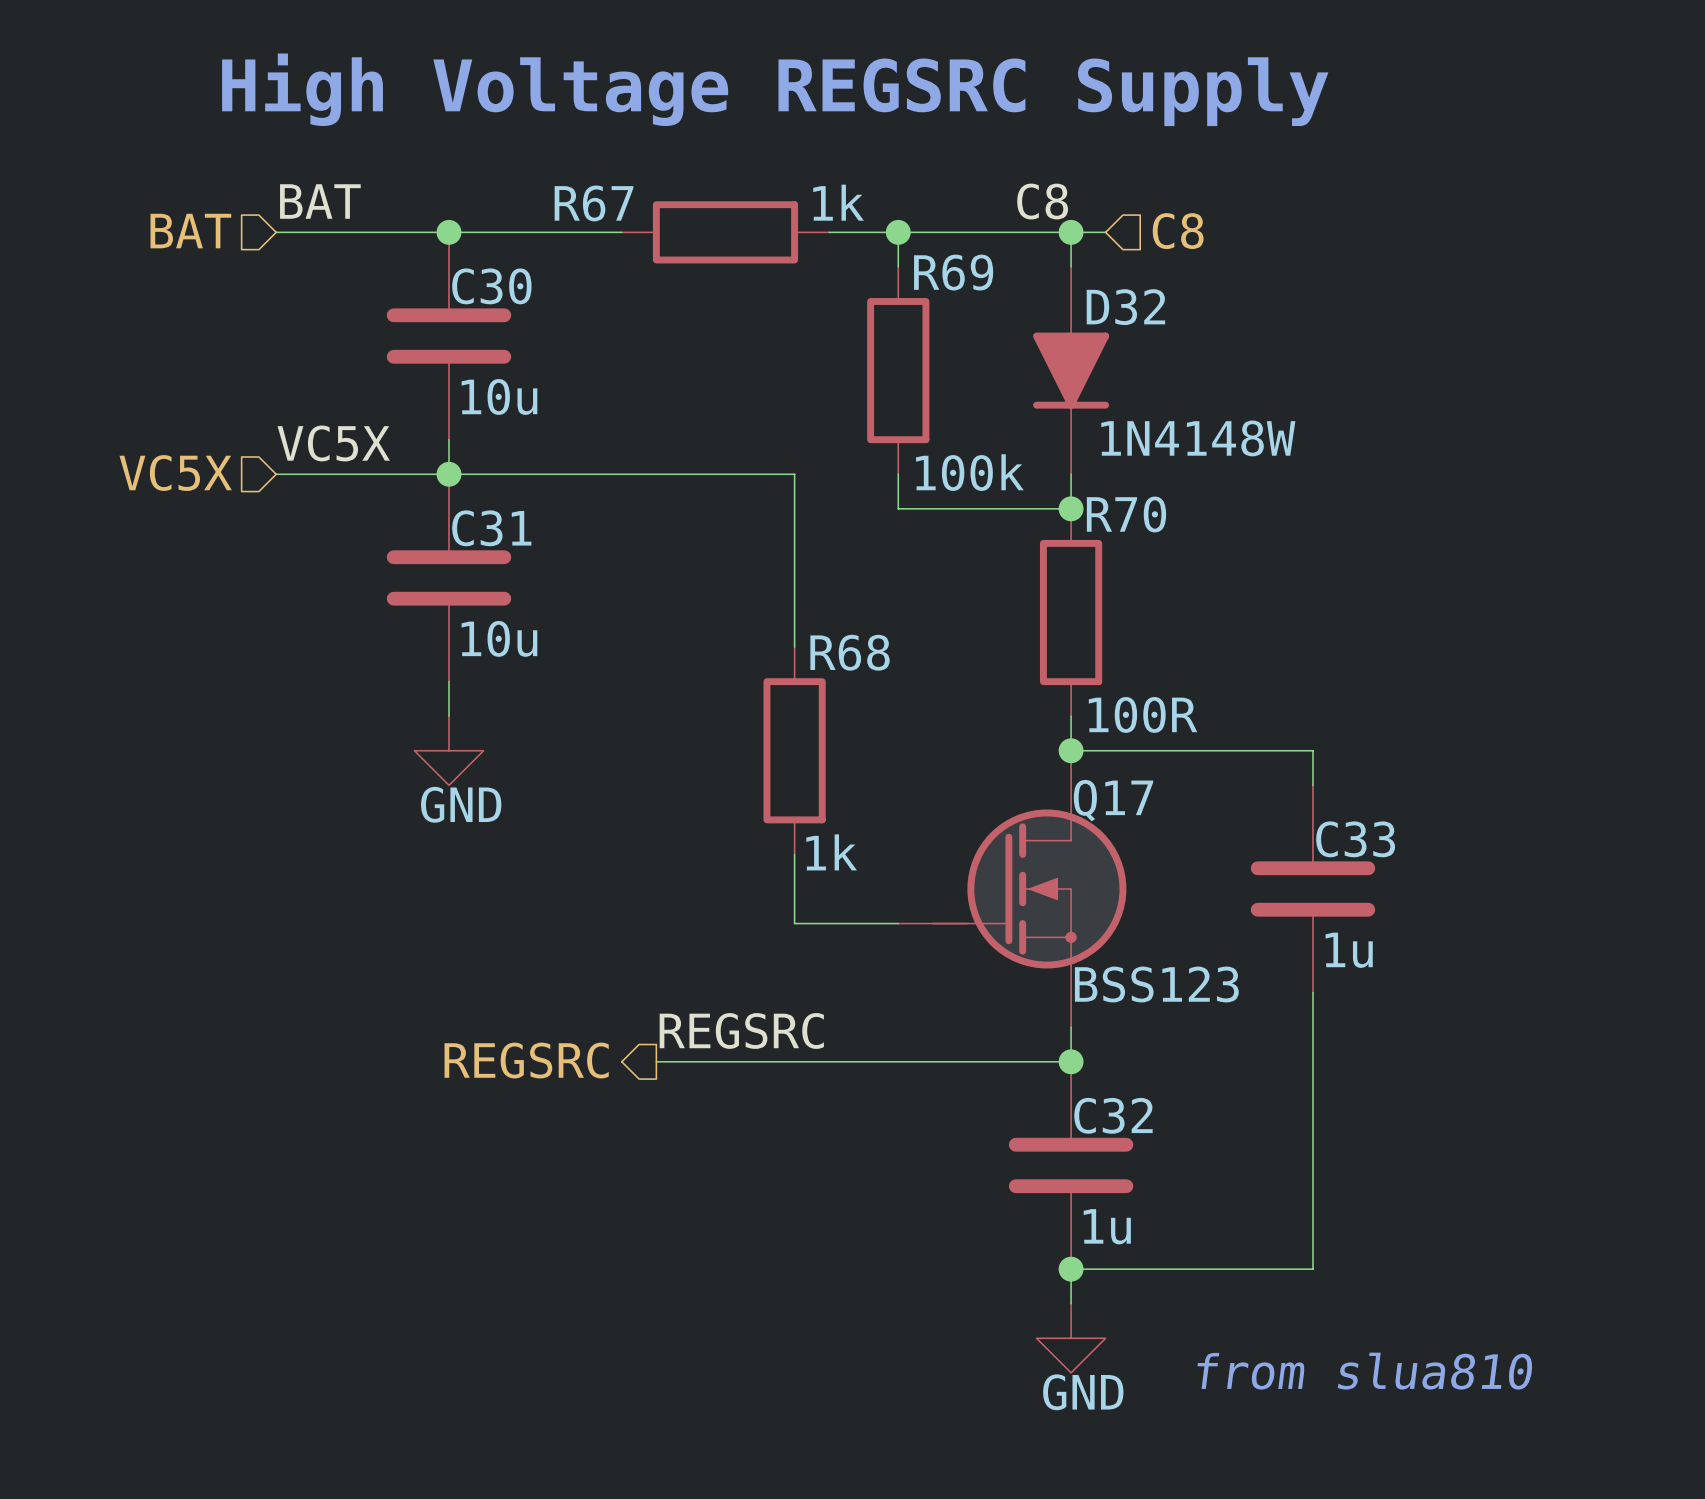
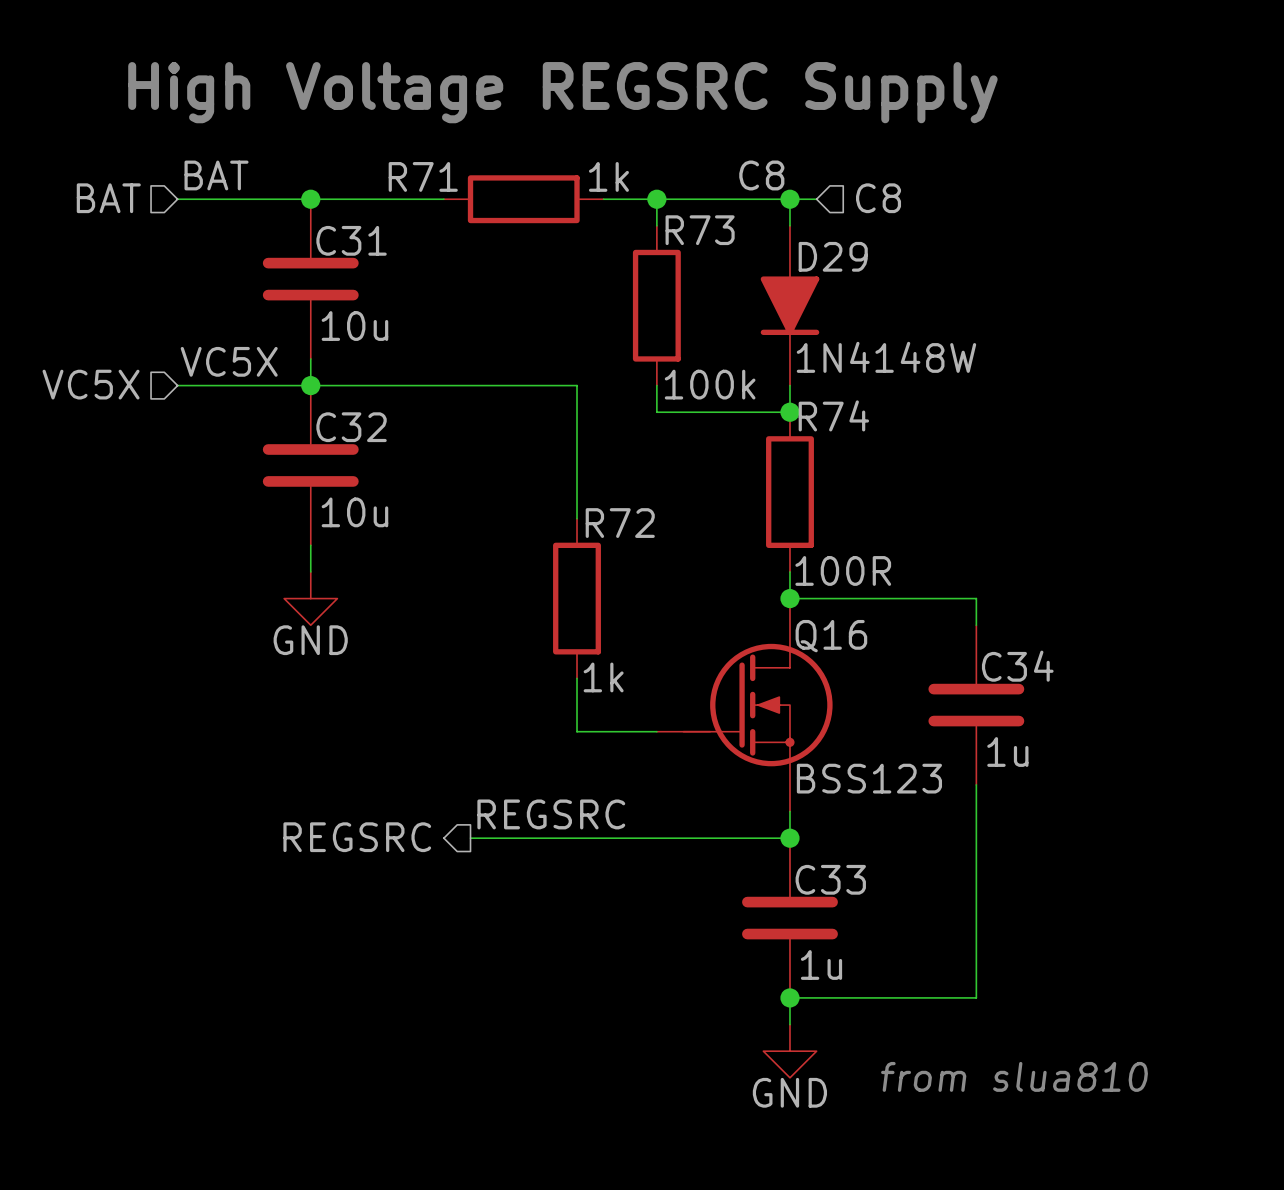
R67 name: R67 (594, 203) -> R71 (423, 176)
R69 name: R69 (953, 272) -> R73 (700, 230)
C30 name: C30 (491, 286) -> C31 (351, 240)
D32 name: D32 (1125, 307) -> D29 (833, 256)
R70 name: R70 (1126, 514) -> R74 (833, 415)
C31 name: C31 (491, 528) -> C32 (351, 427)
R68 name: R68 (850, 652) -> R72 (620, 523)
Q17 name: Q17 (1113, 800) -> Q16 (831, 636)
C33 name: C33 (1355, 839) -> C34 (1017, 666)
C32 name: C32 (1113, 1115) -> C33 (830, 879)

